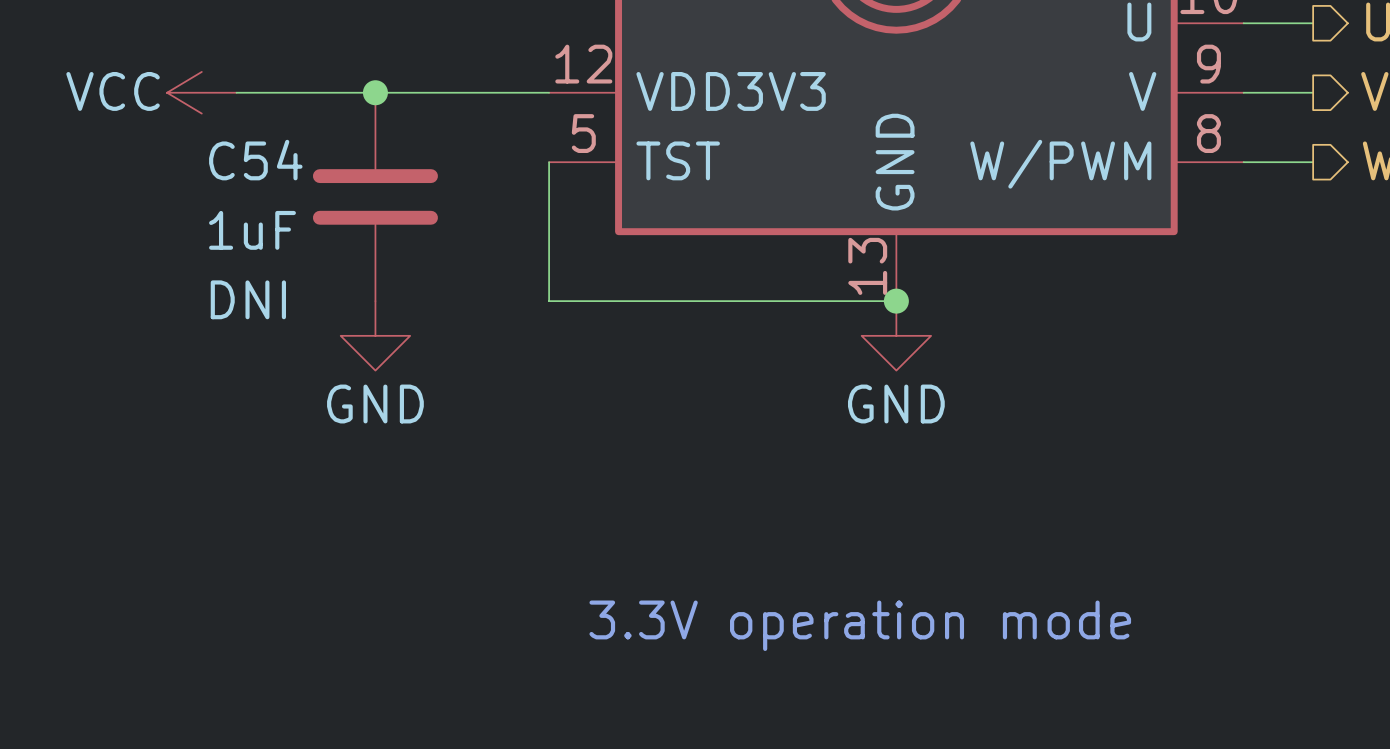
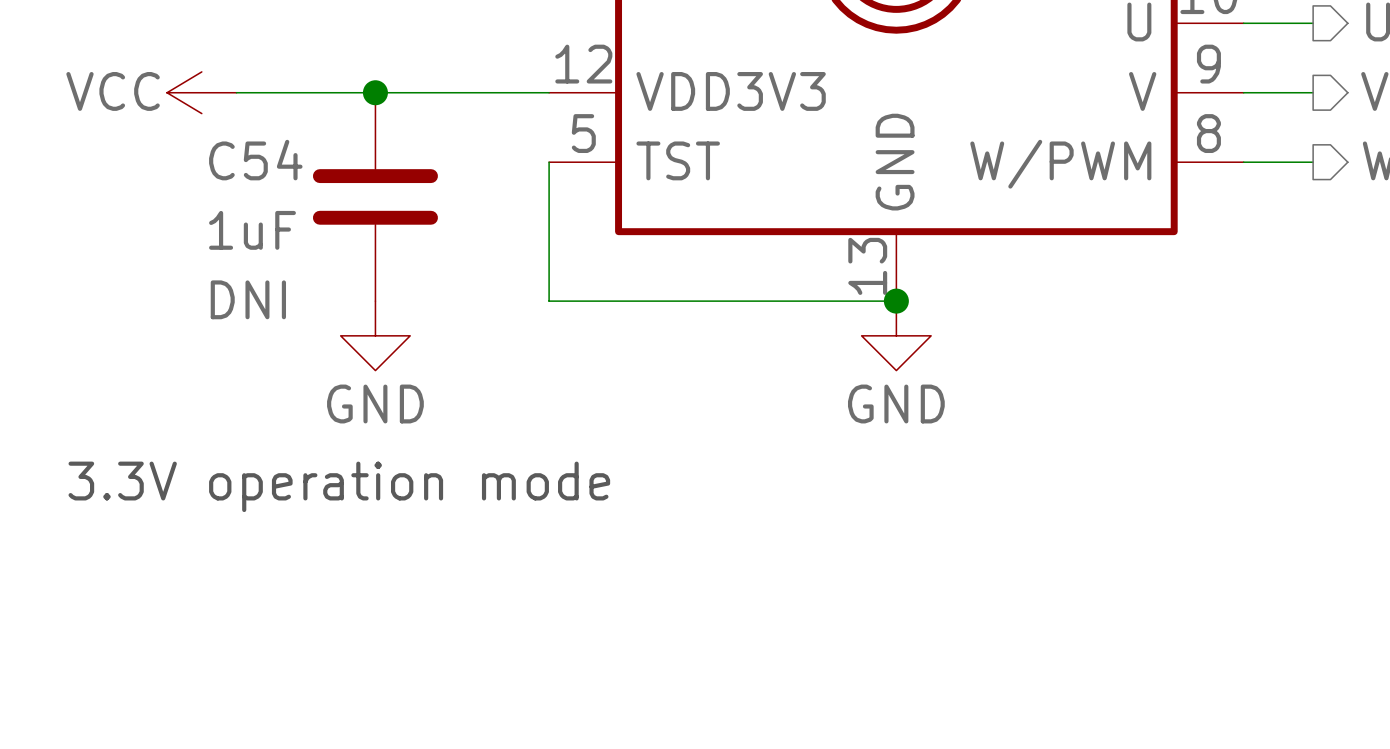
text position: 3.3V operation mode (860, 625) -> 3.3V operation mode (339, 486)

